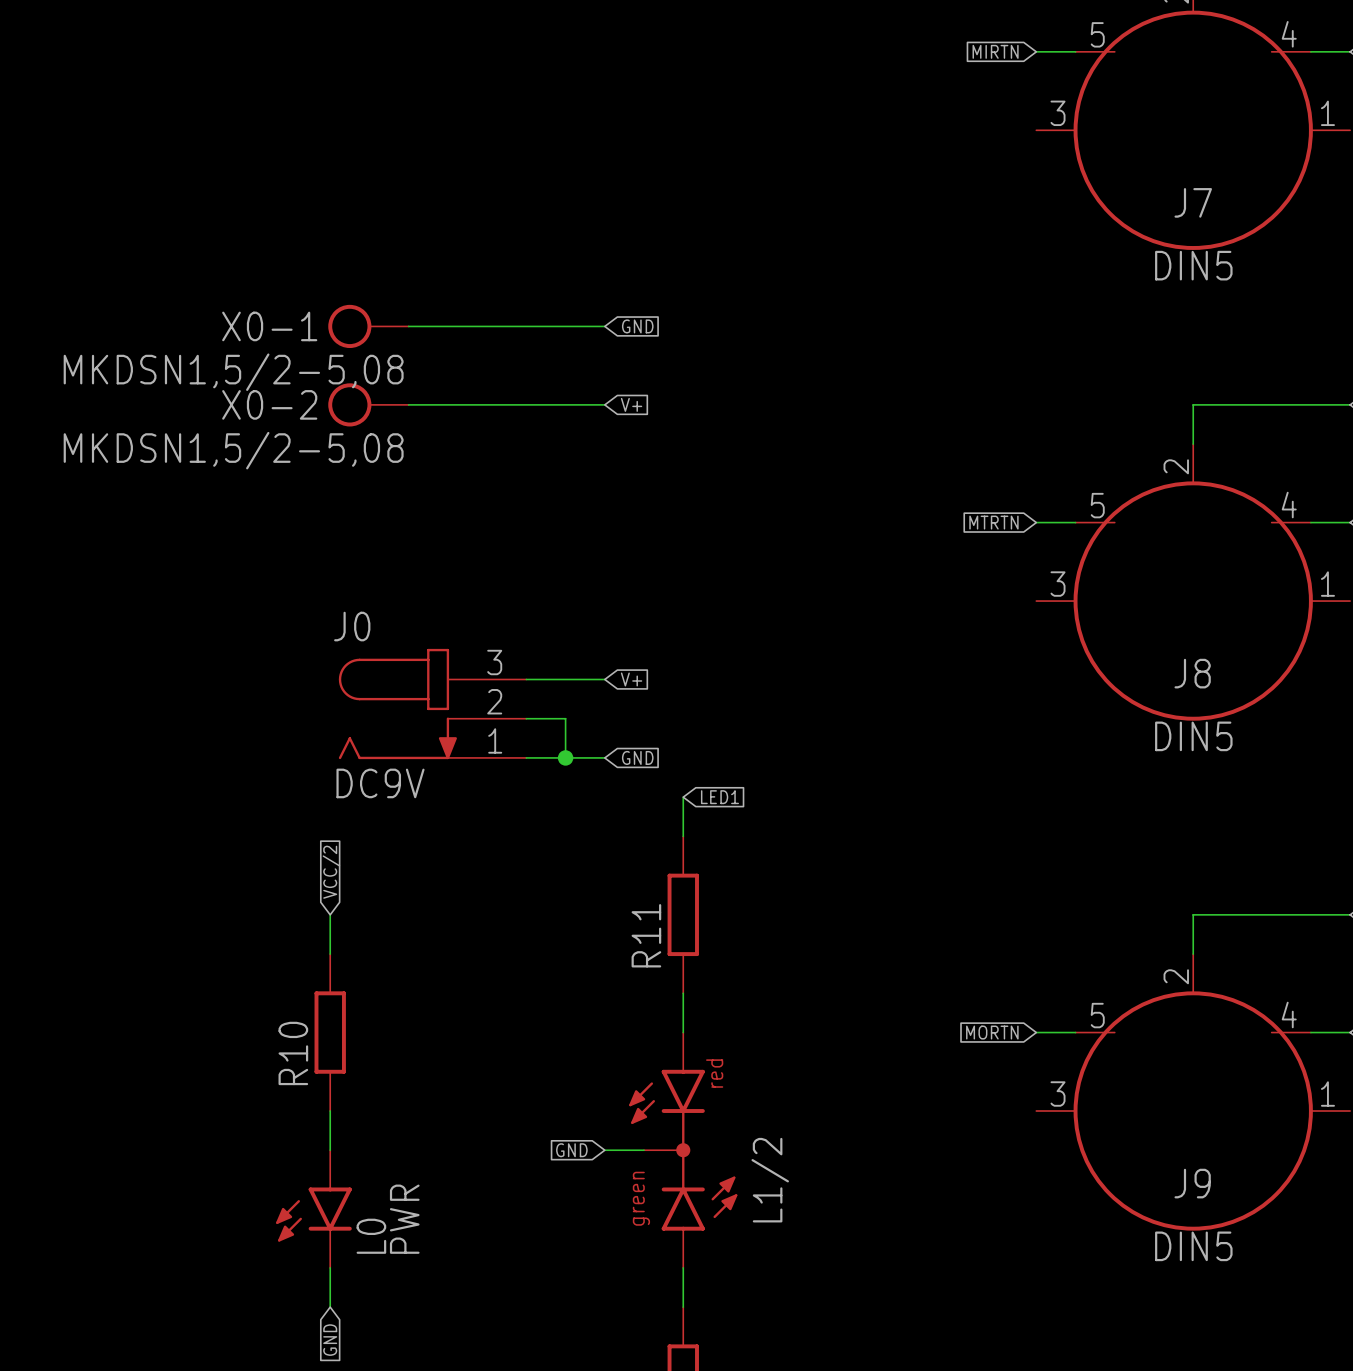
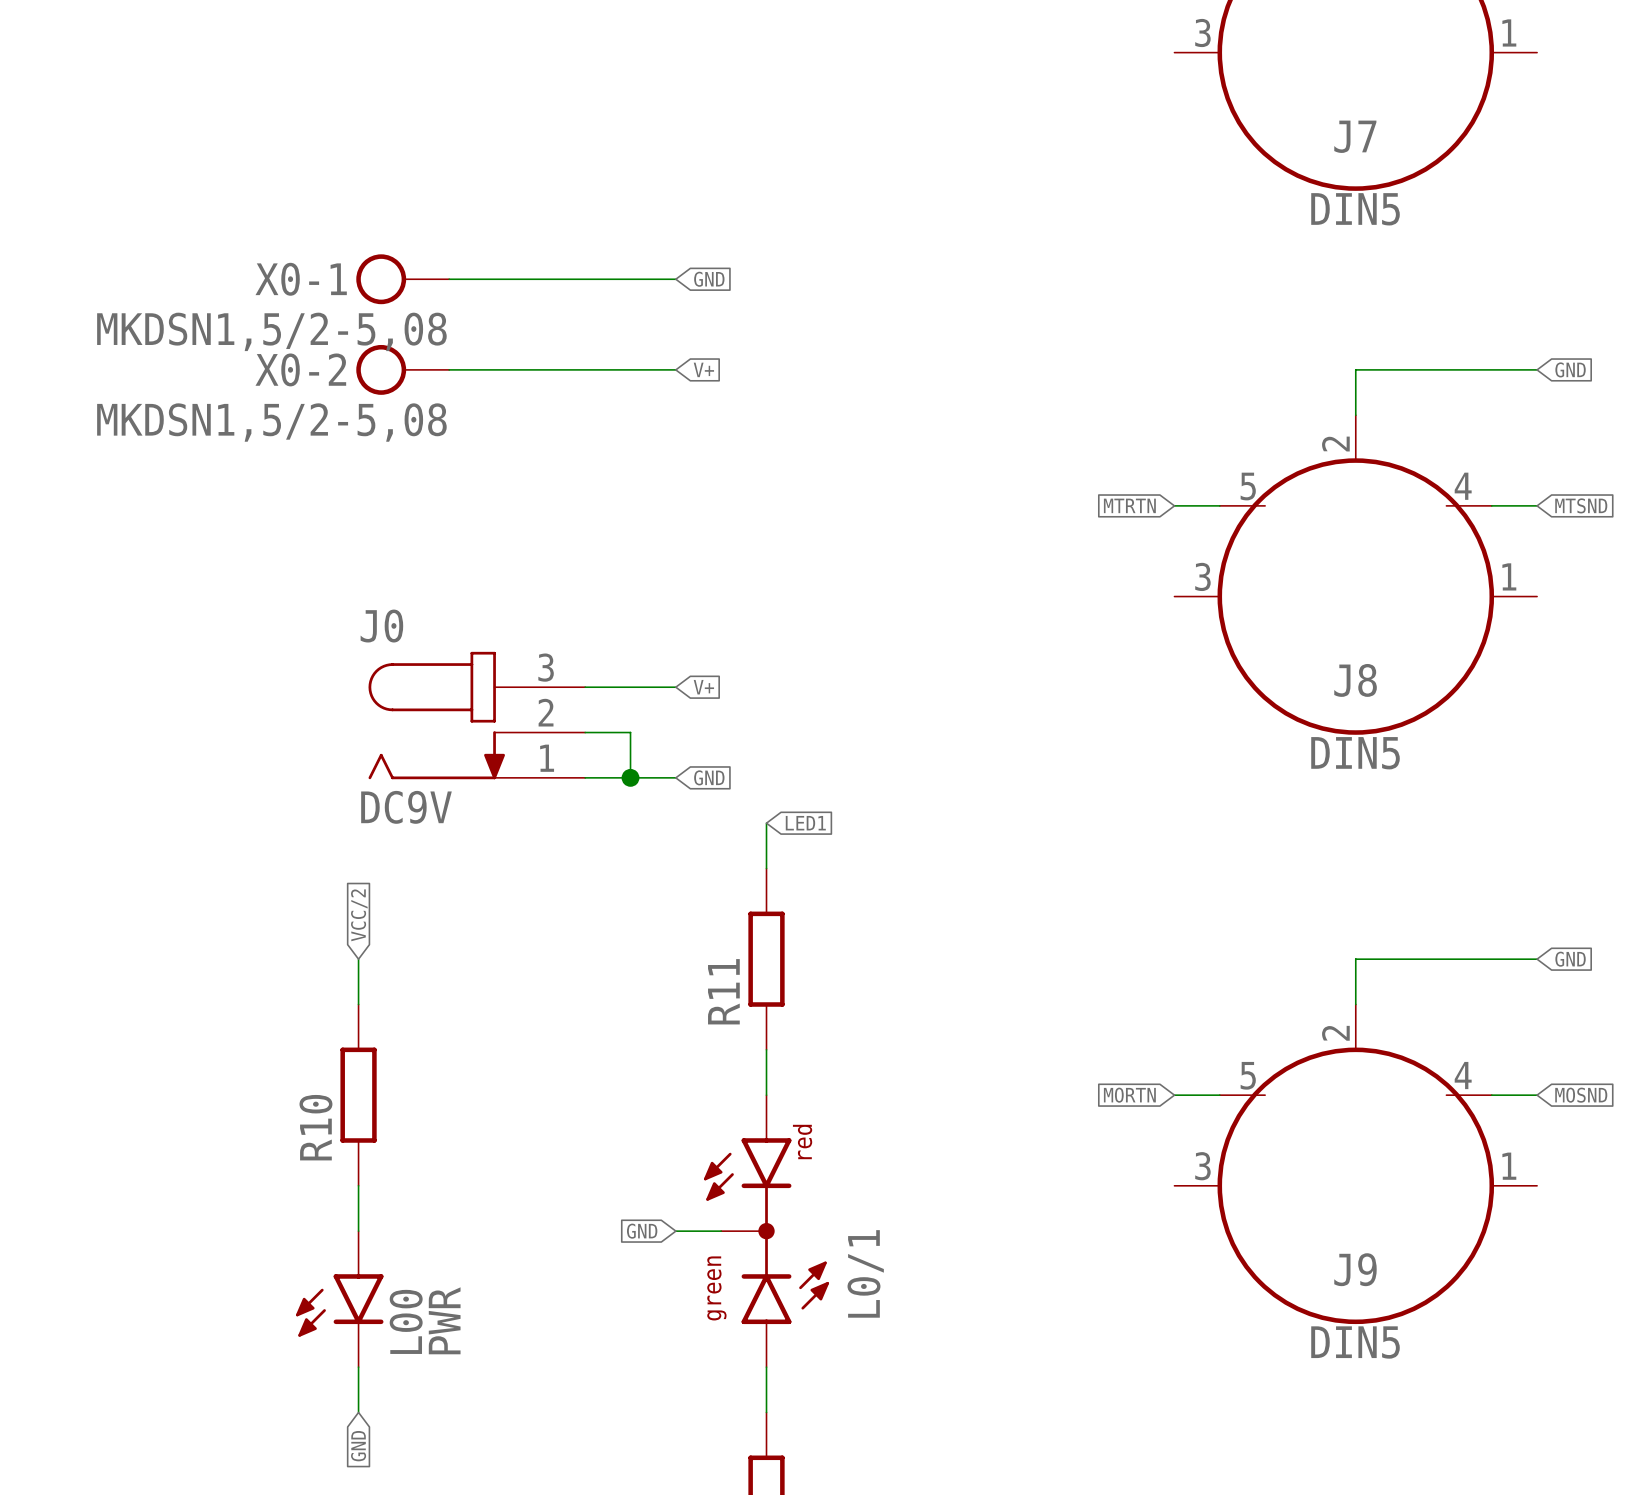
L1/2 name: L1/2 (770, 1180) -> L0/1 (865, 1273)
L0 name: L0 (371, 1236) -> L00 (406, 1321)

